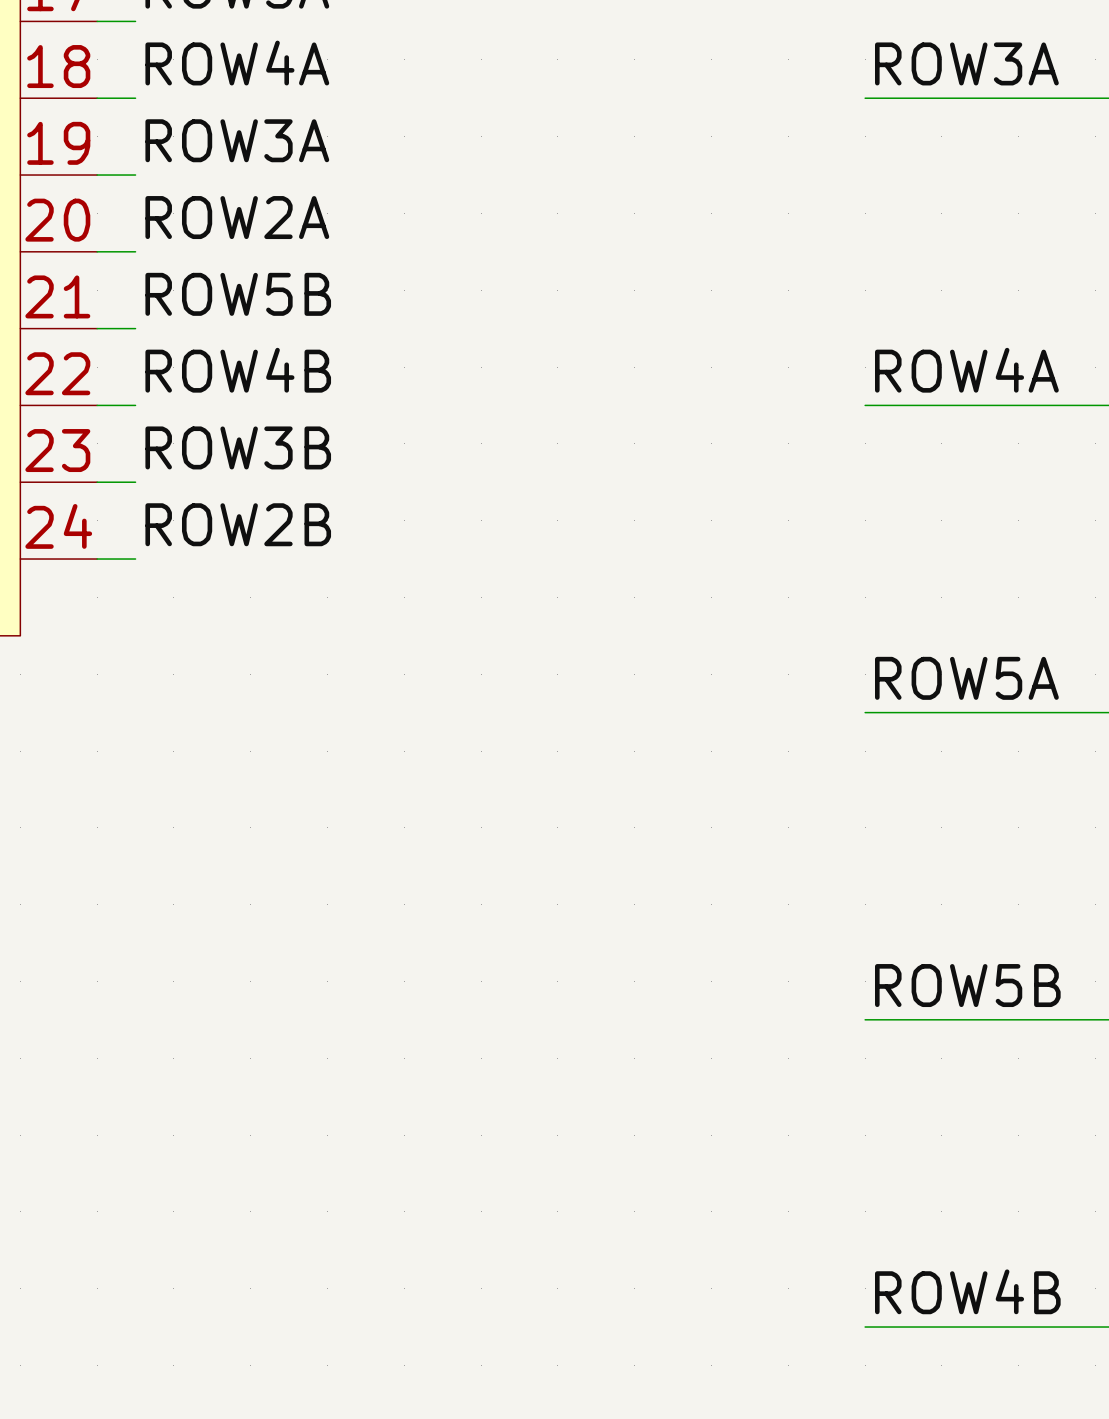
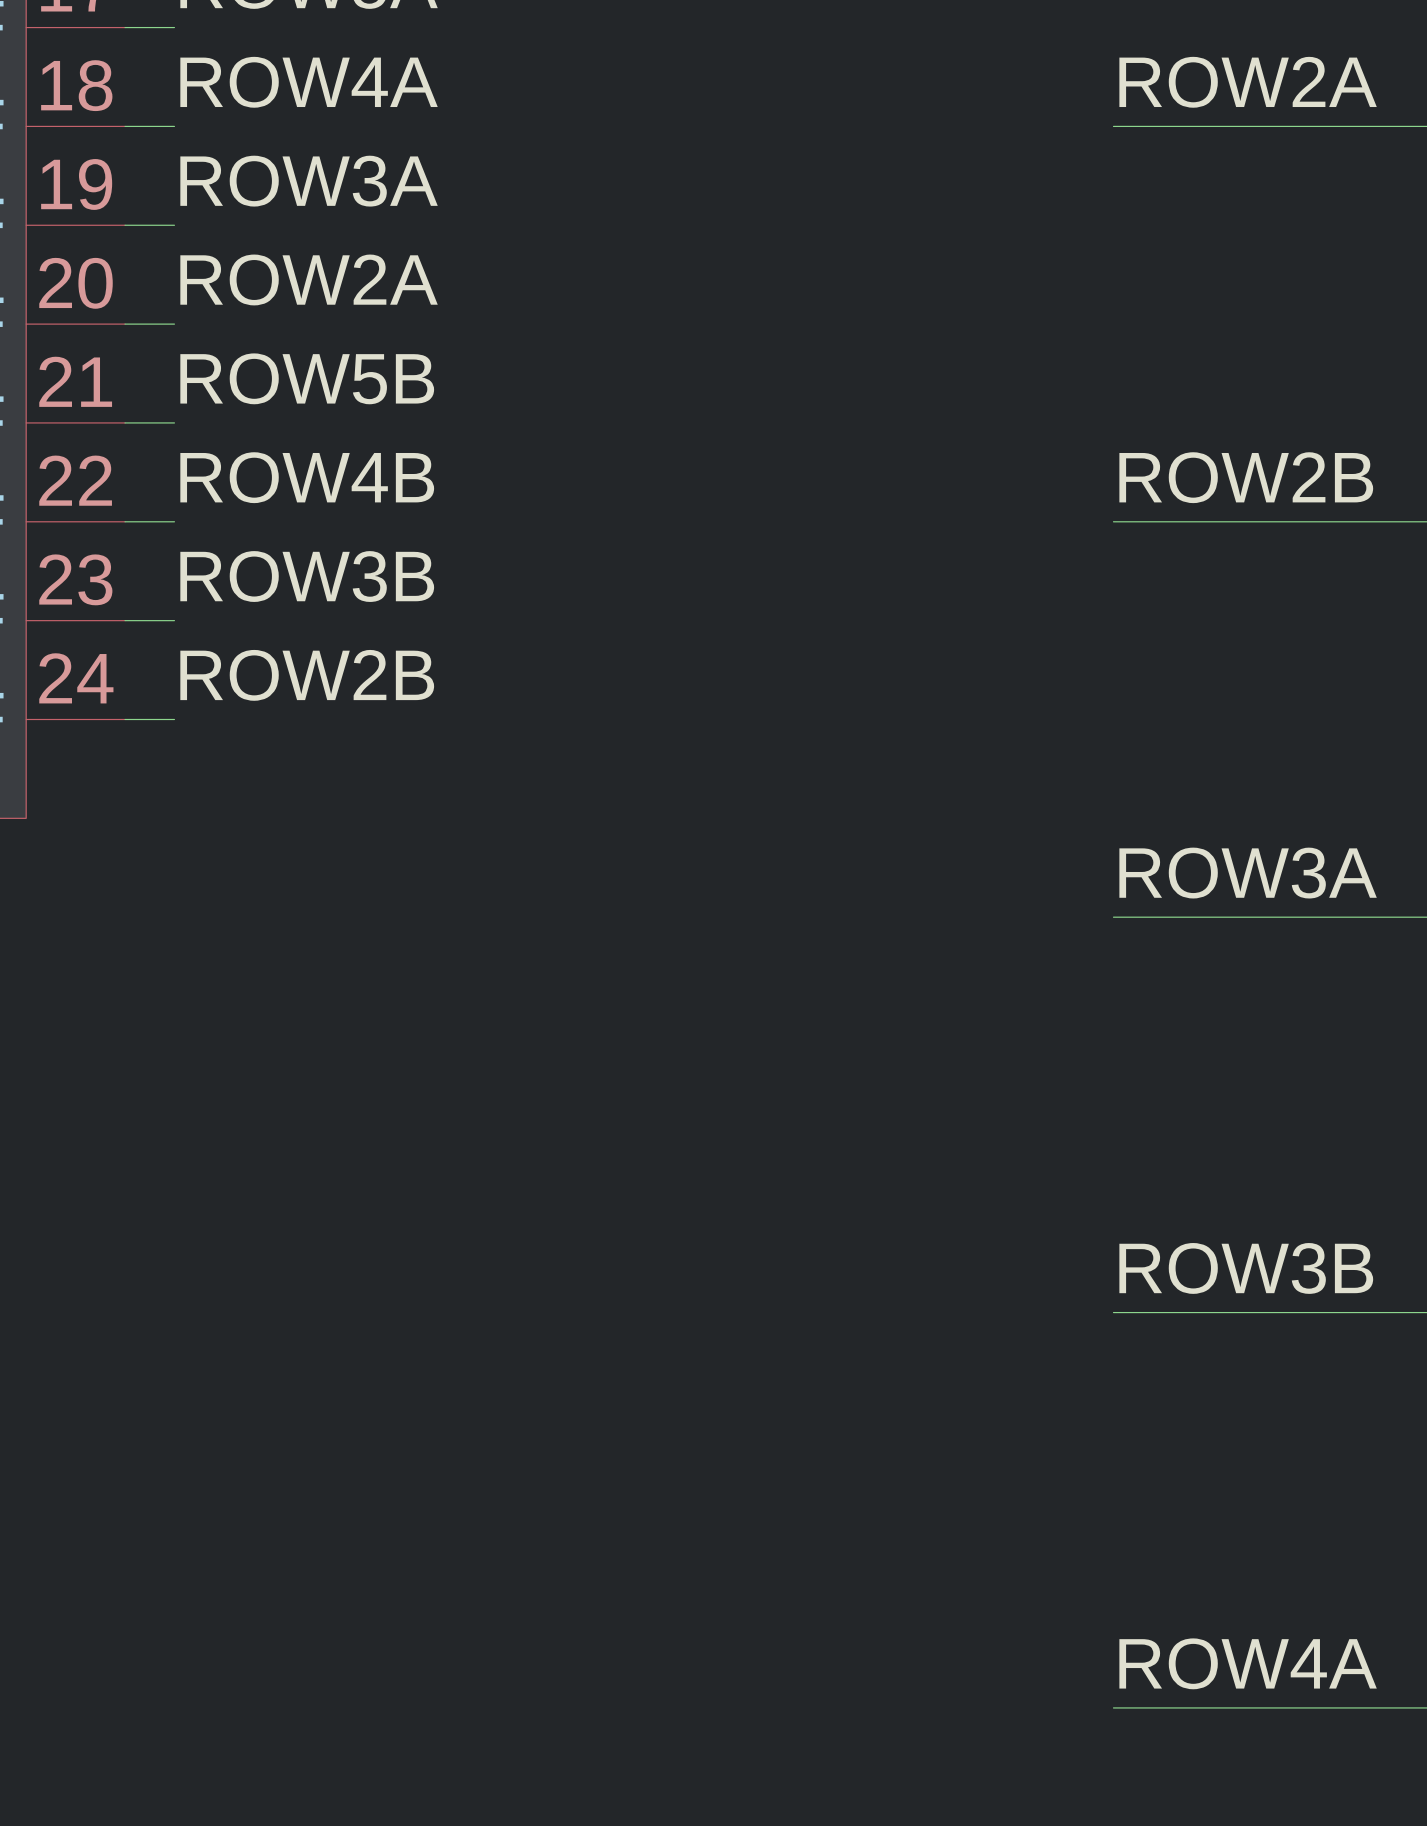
label: ROW3A (966, 63) -> ROW2A (1248, 82)
label: ROW4A (966, 370) -> ROW2B (1246, 477)
label: ROW5A (966, 678) -> ROW3A (1248, 873)
label: ROW5B (967, 985) -> ROW3B (1246, 1268)
label: ROW4B (967, 1291) -> ROW4A (1248, 1663)

